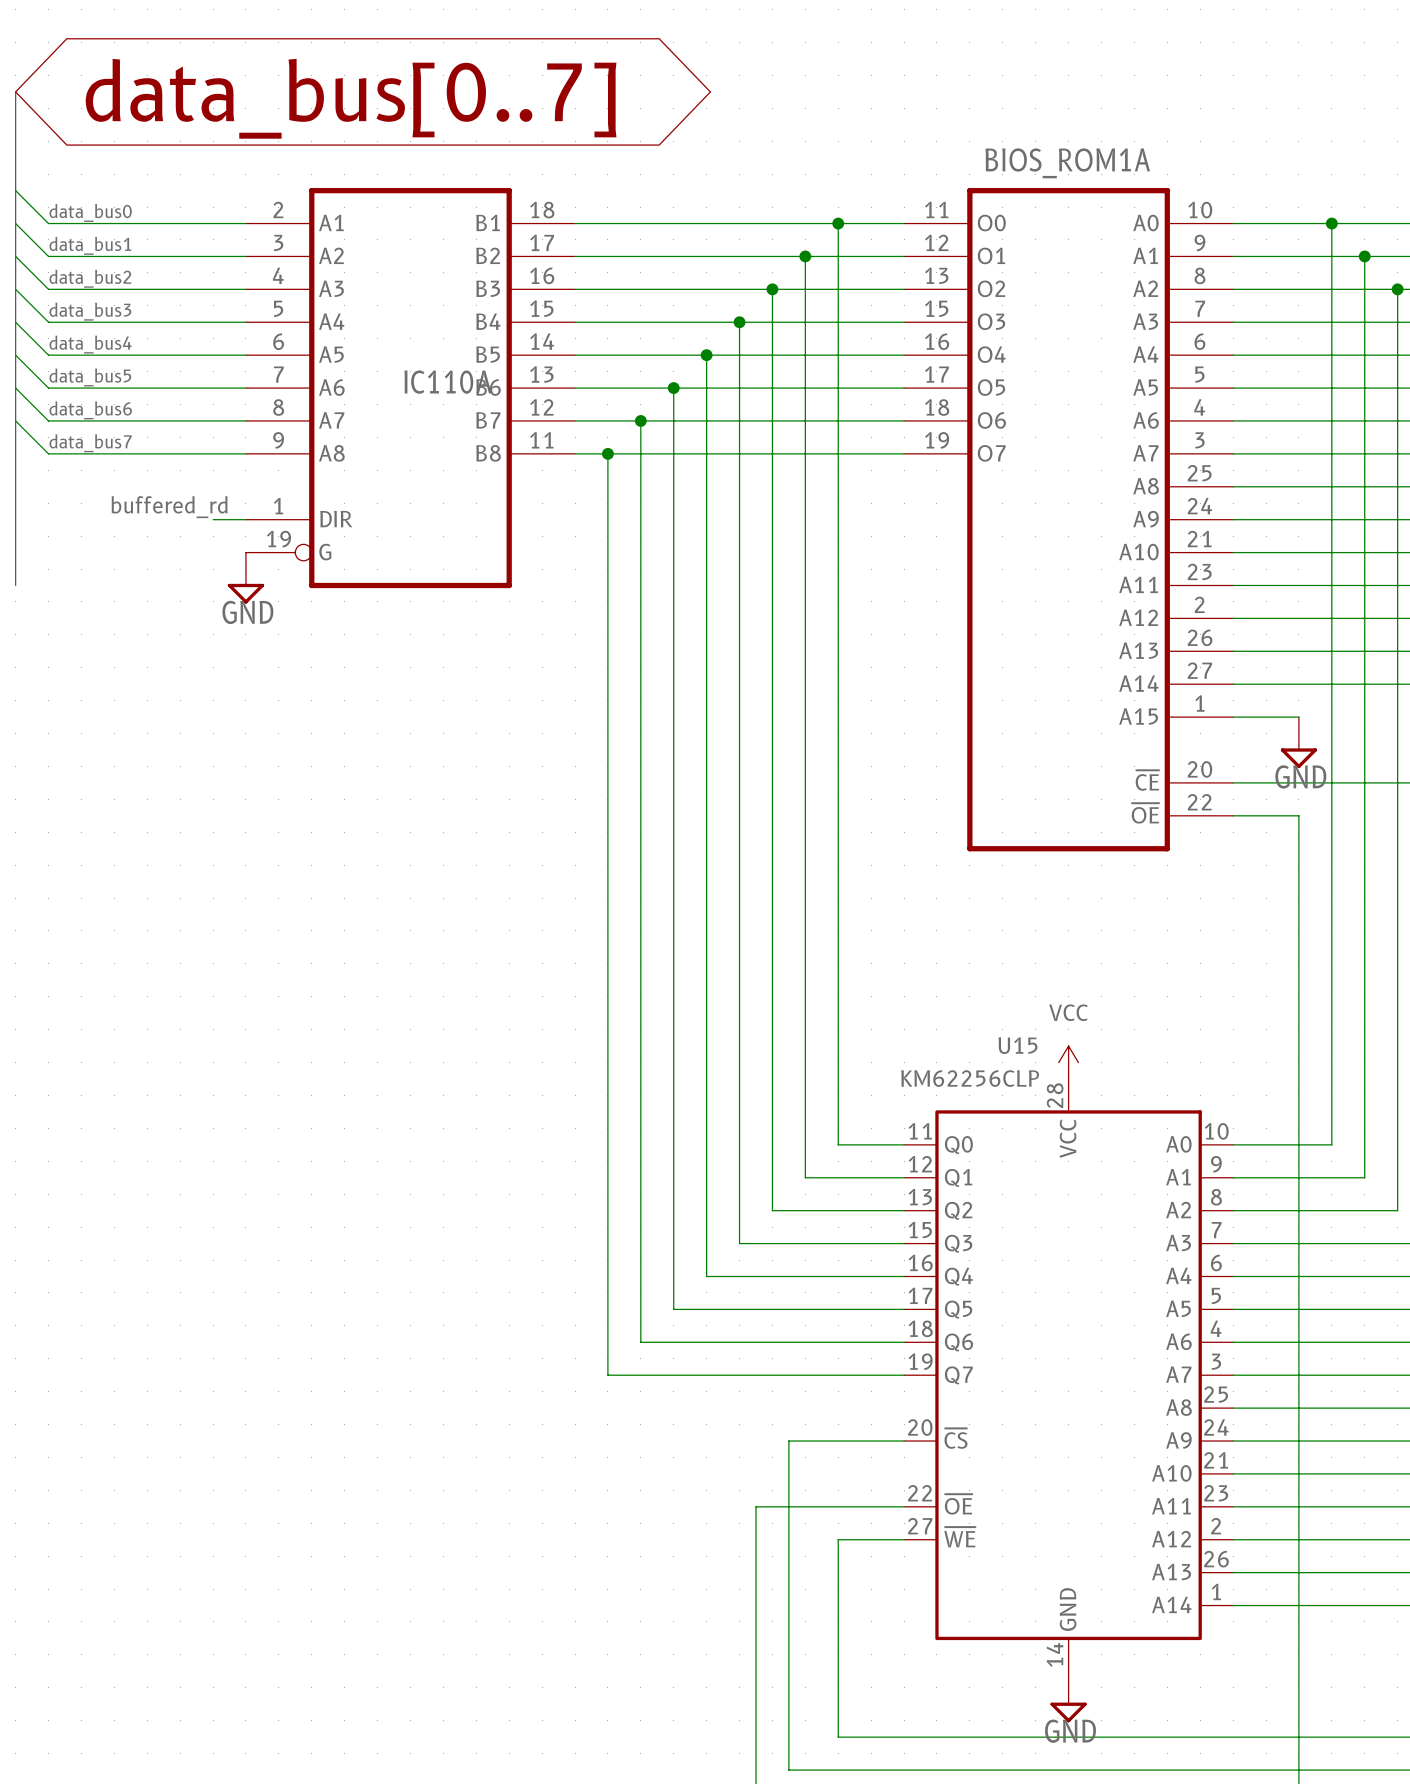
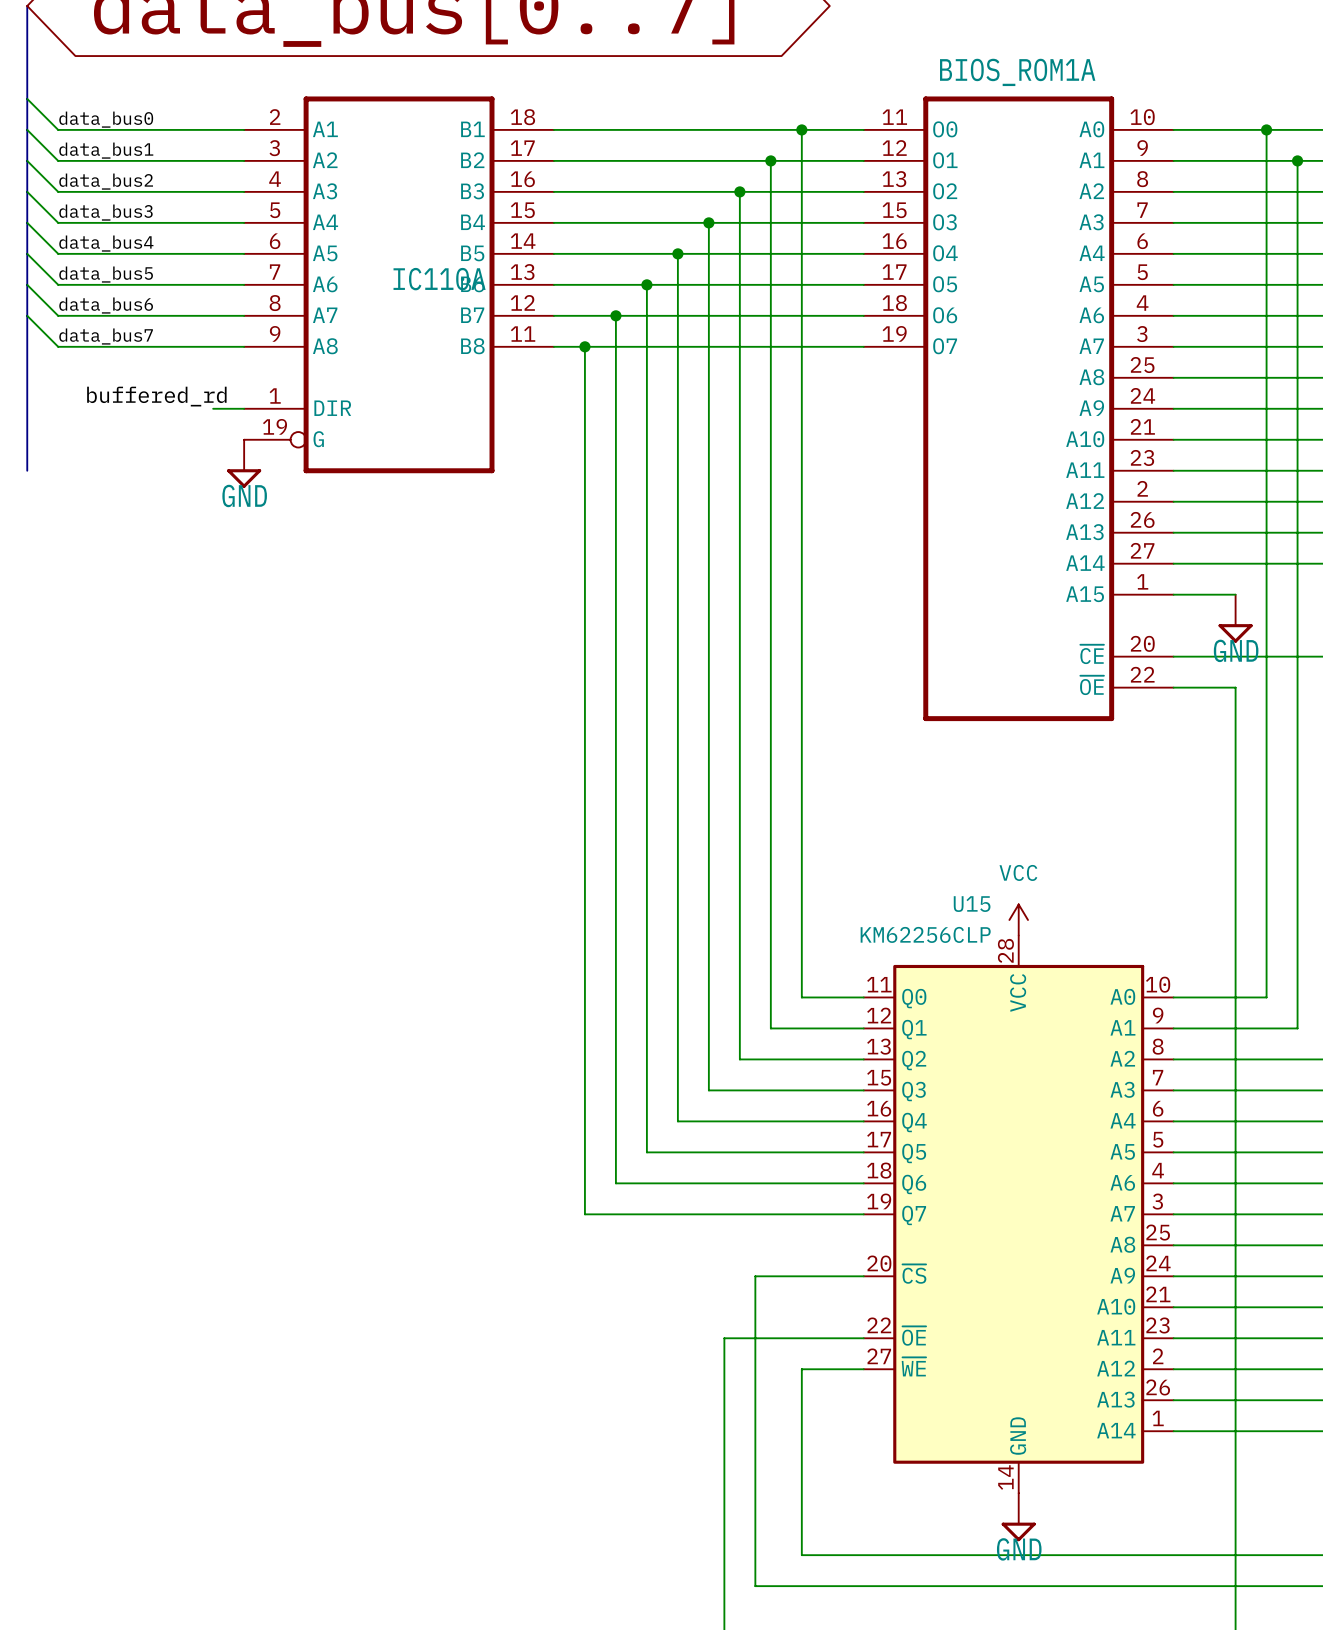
U15 symbol: [904, 1079, 1234, 1672] -> [863, 935, 1174, 1494]

